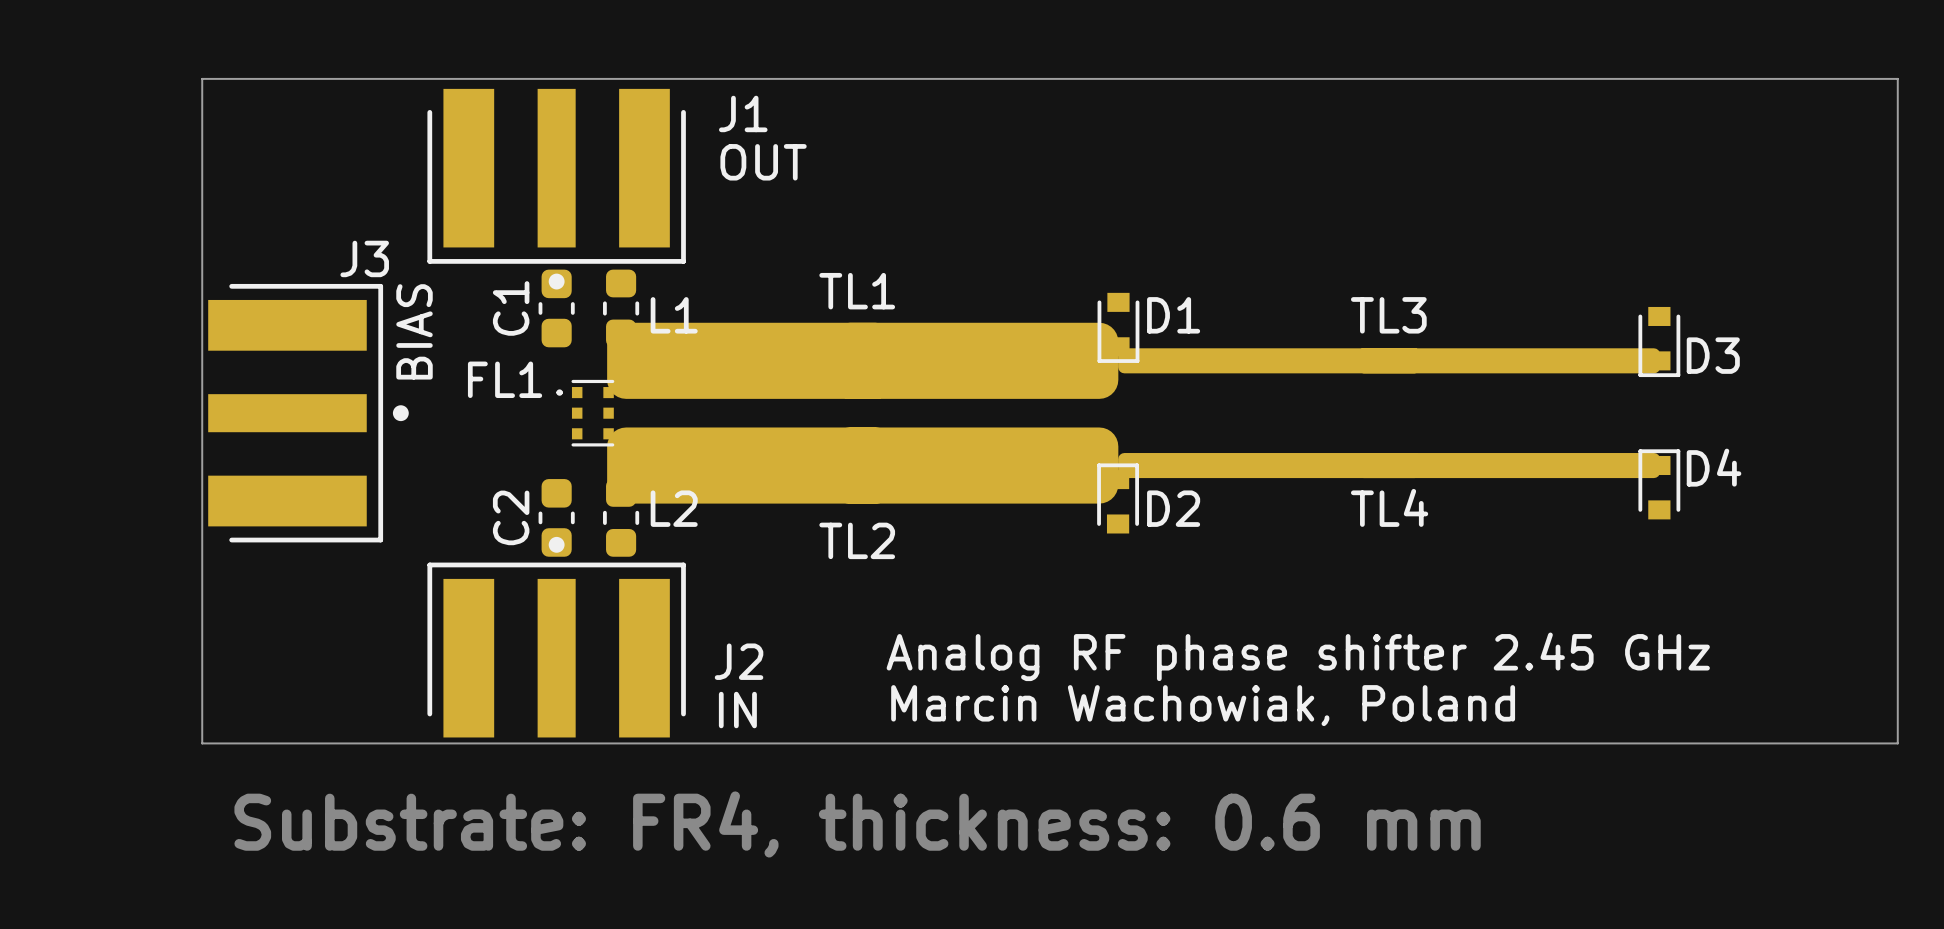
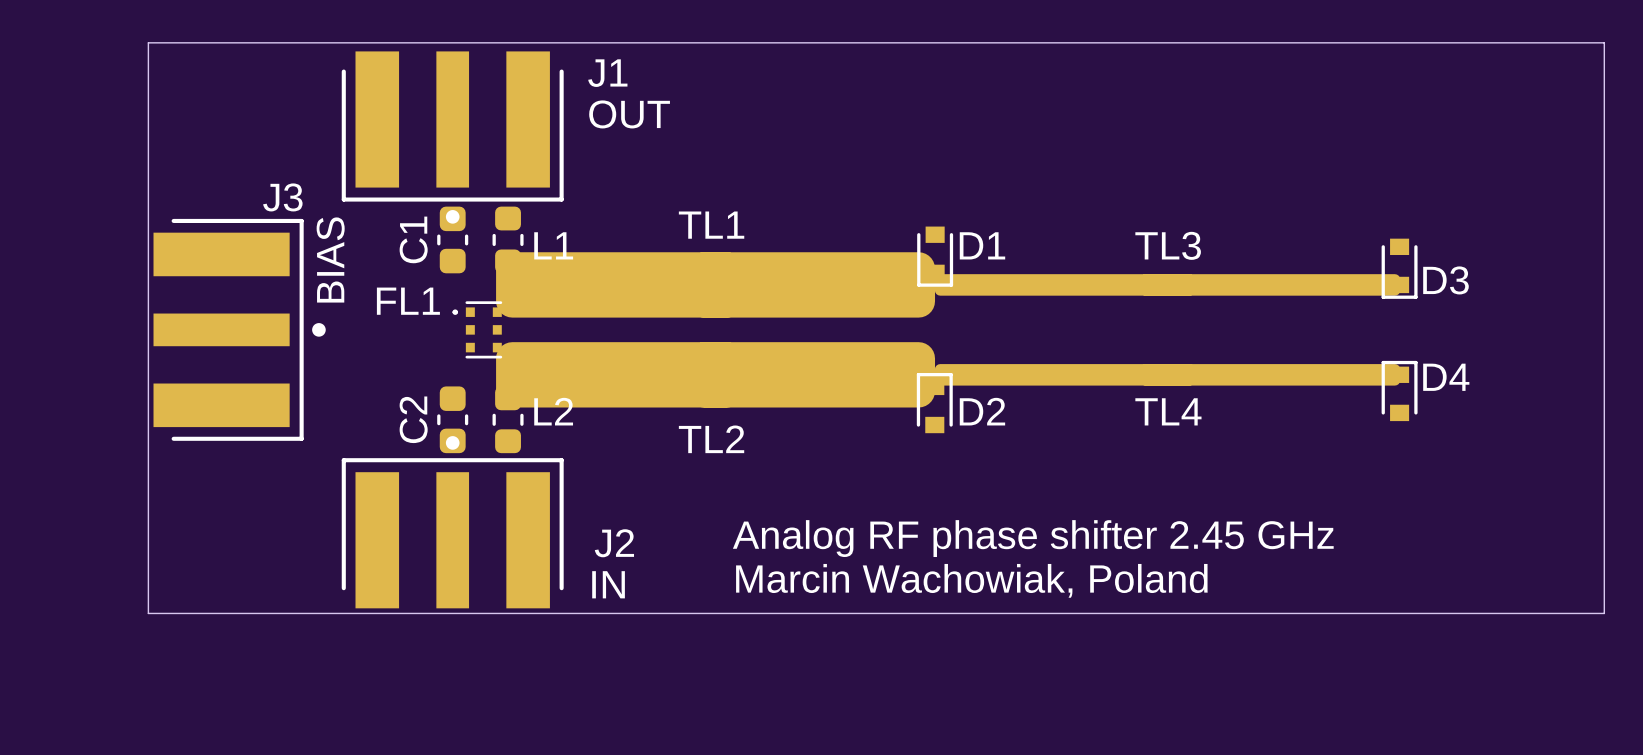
text: Substrate: FR4, thickness: 0.6 mm (857, 824) -> none

